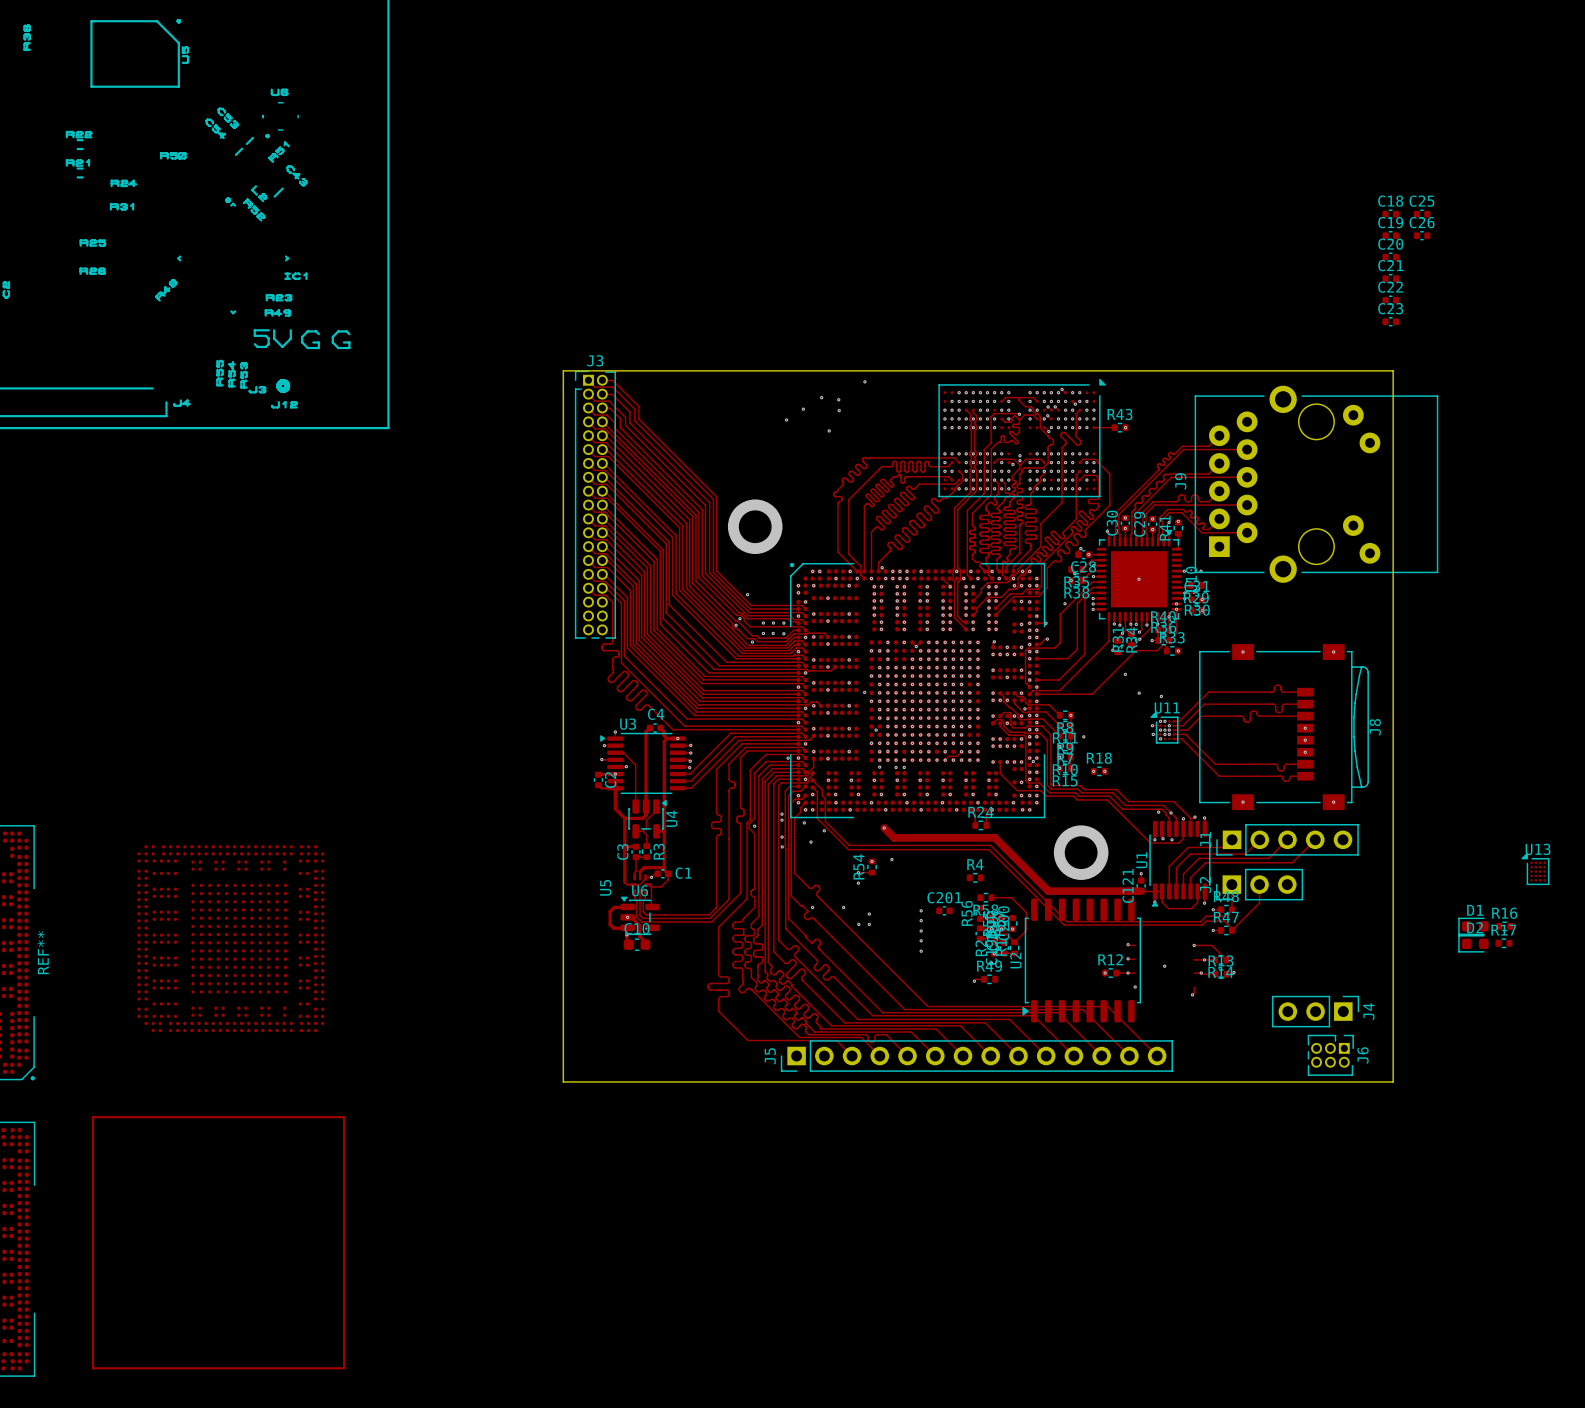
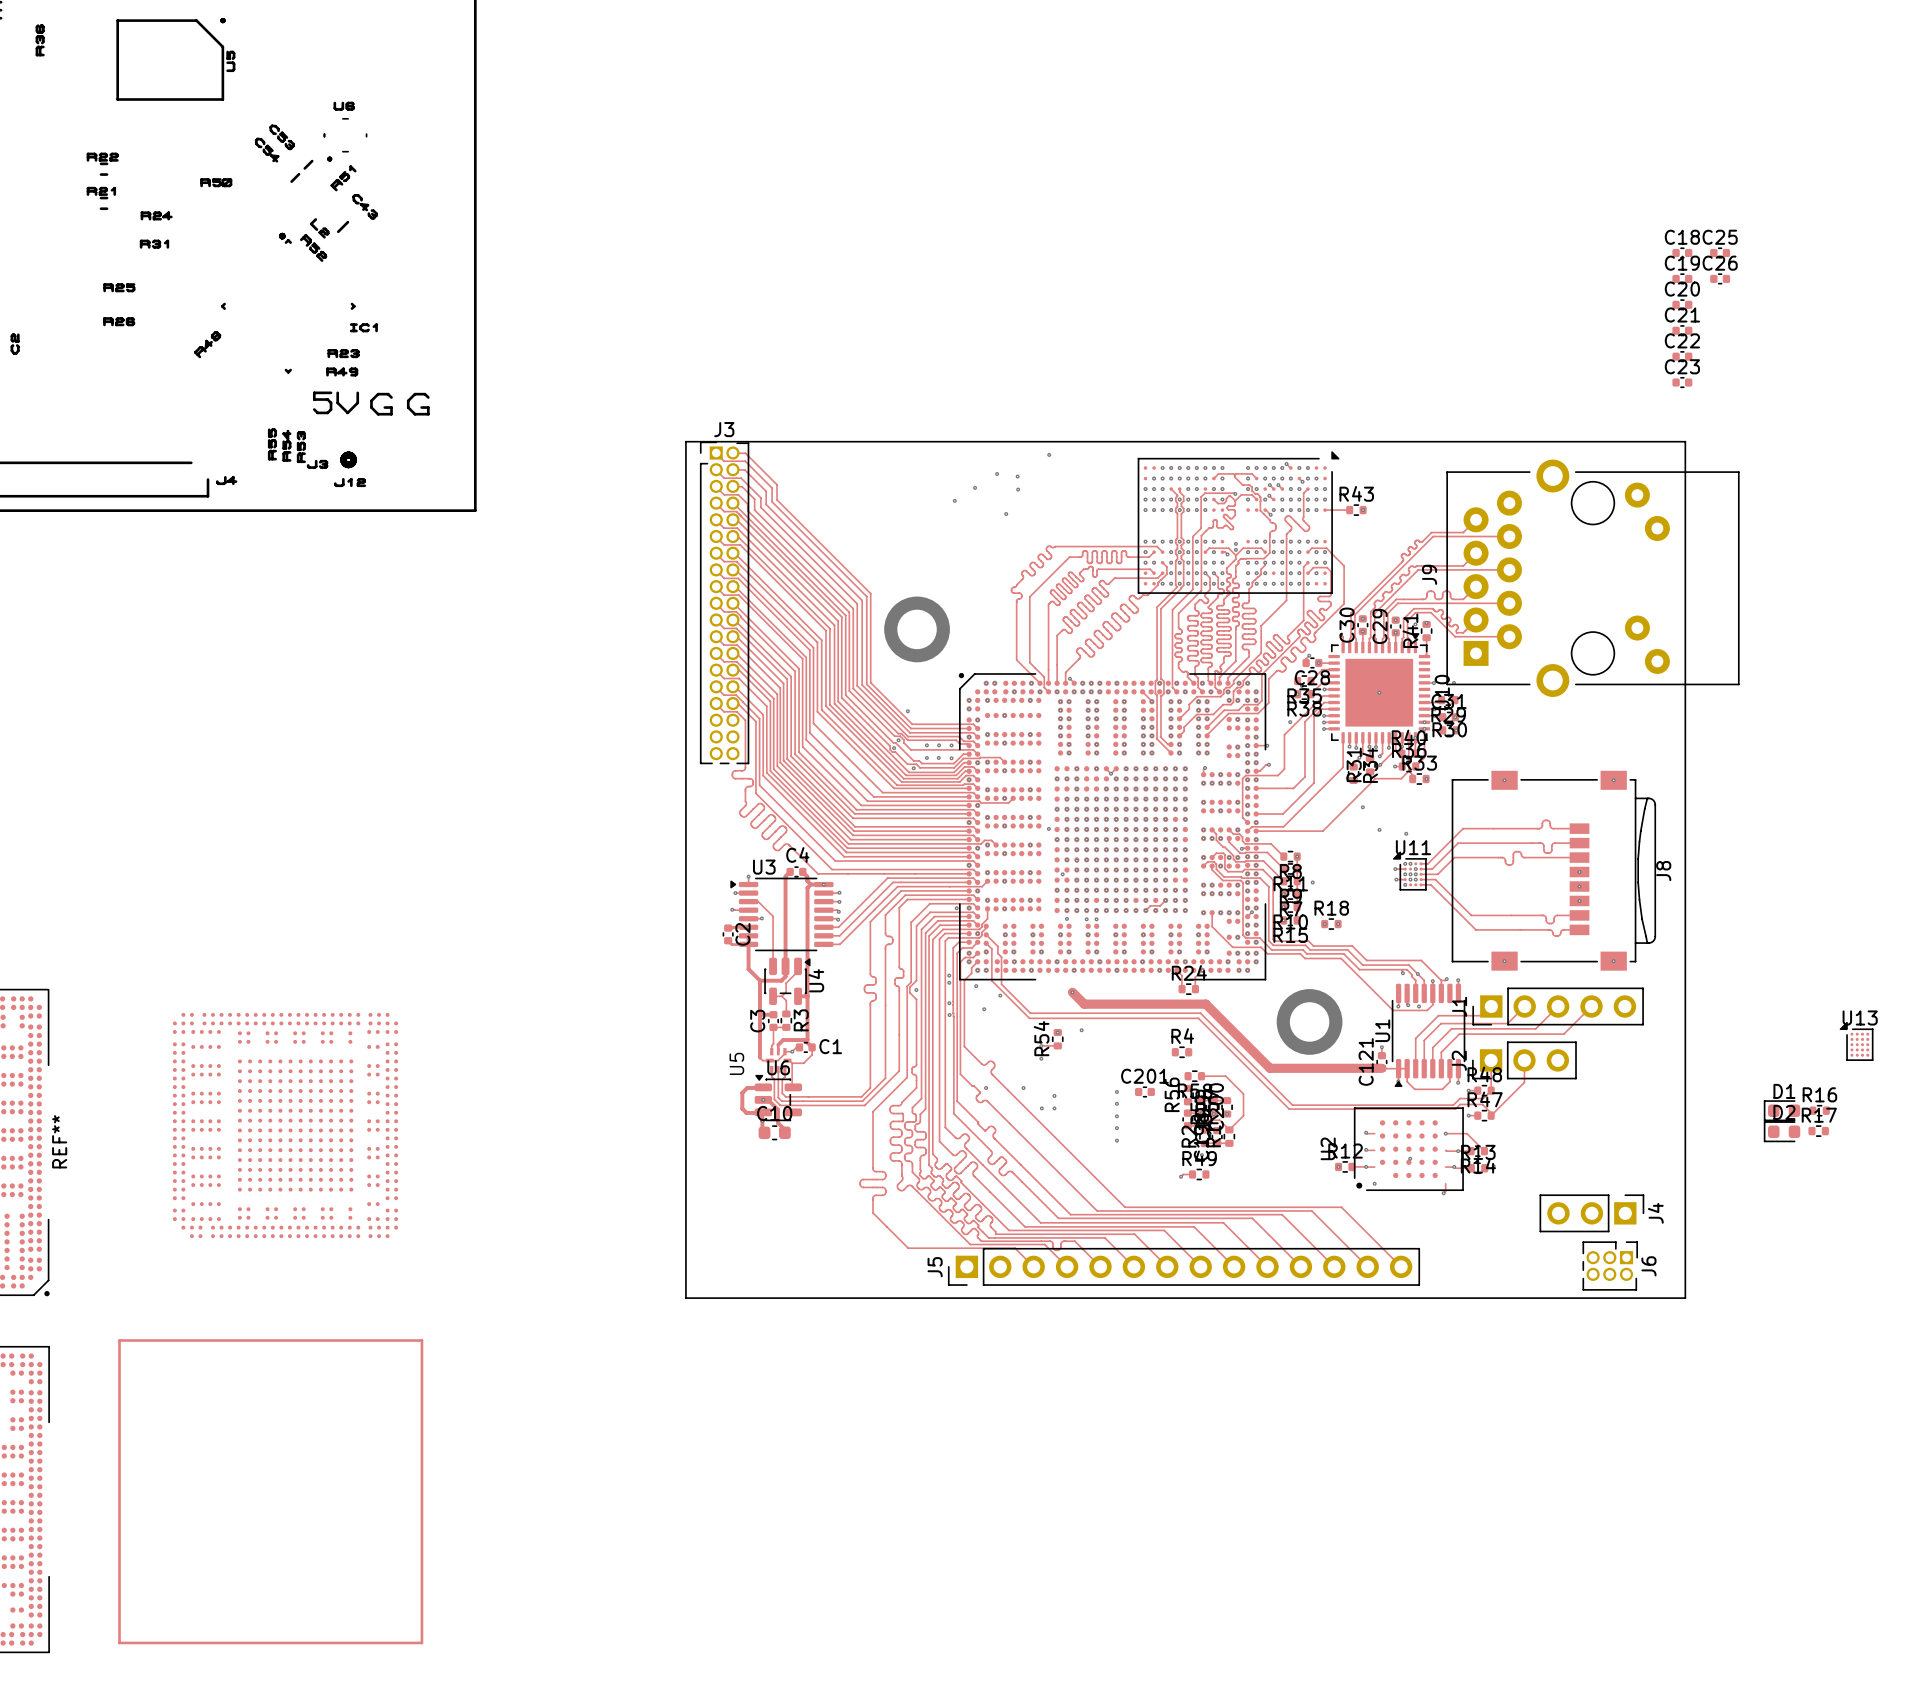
U2 footprint: [1022, 898, 1141, 1023] -> [1353, 1107, 1464, 1191]

